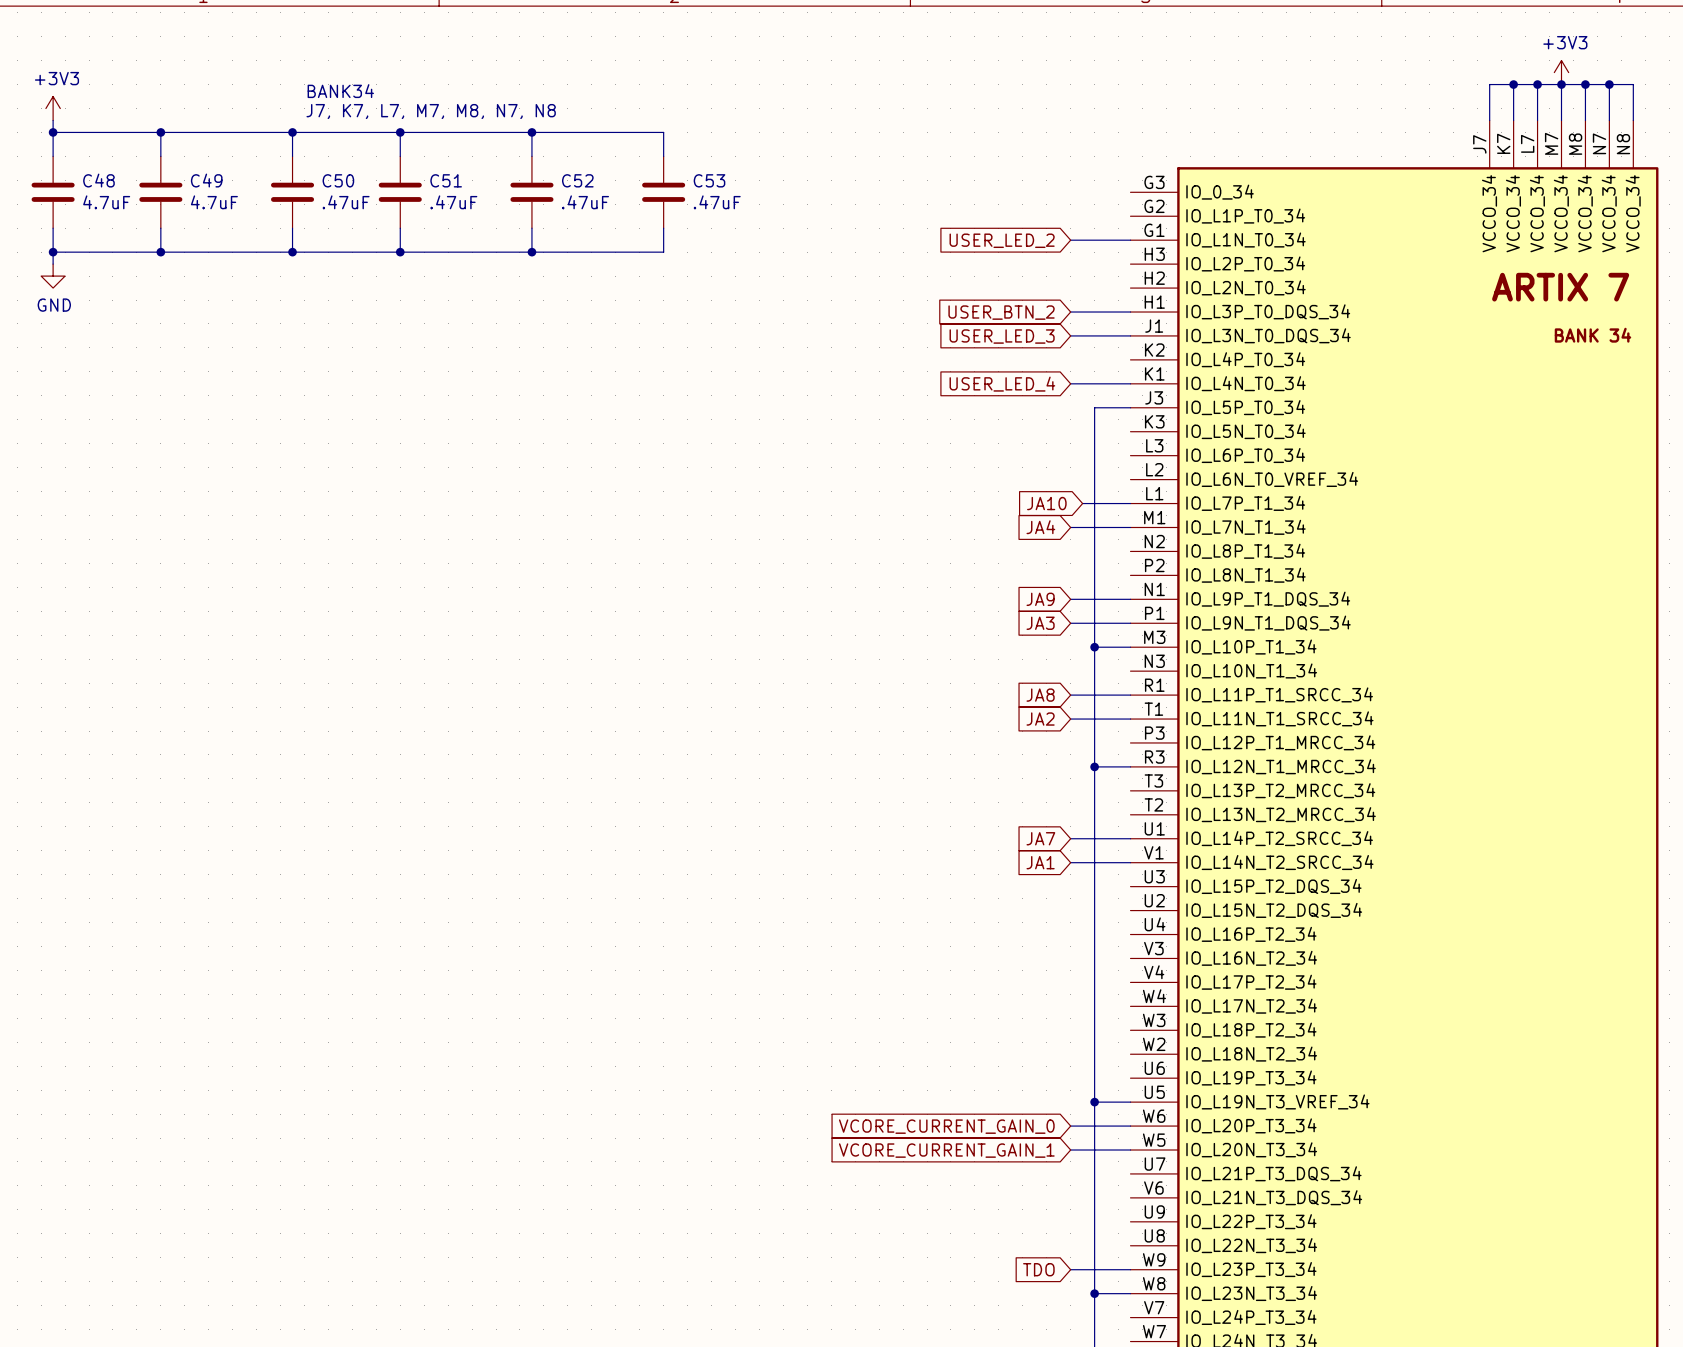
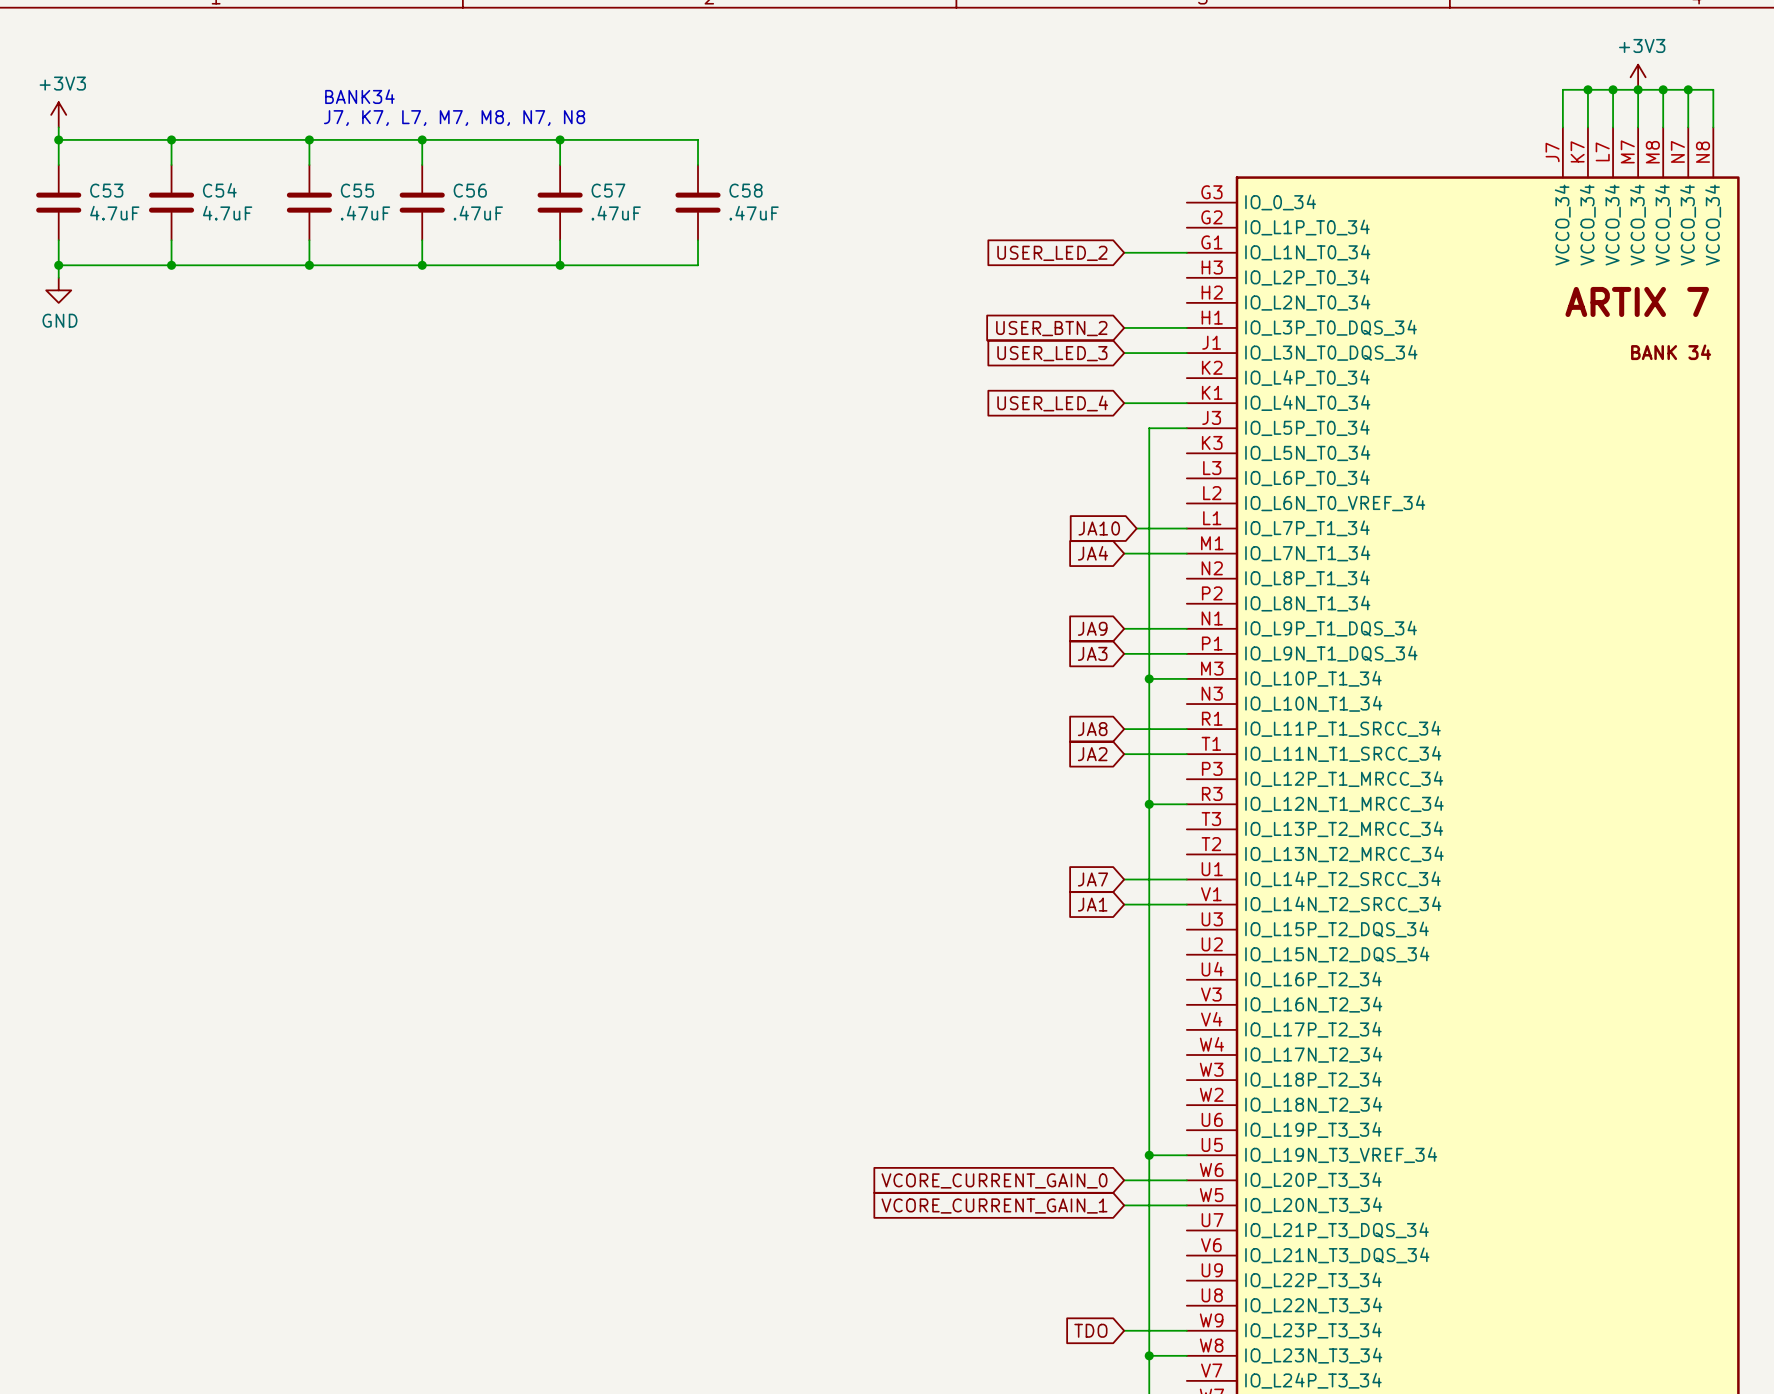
C48 name: C48 (98, 180) -> C53 (106, 190)
C49 name: C49 (206, 180) -> C54 (219, 190)
C50 name: C50 (338, 180) -> C55 (357, 190)
C51 name: C51 (446, 180) -> C56 (470, 190)
C52 name: C52 (577, 180) -> C57 (608, 190)
C53 name: C53 (709, 180) -> C58 (746, 190)

